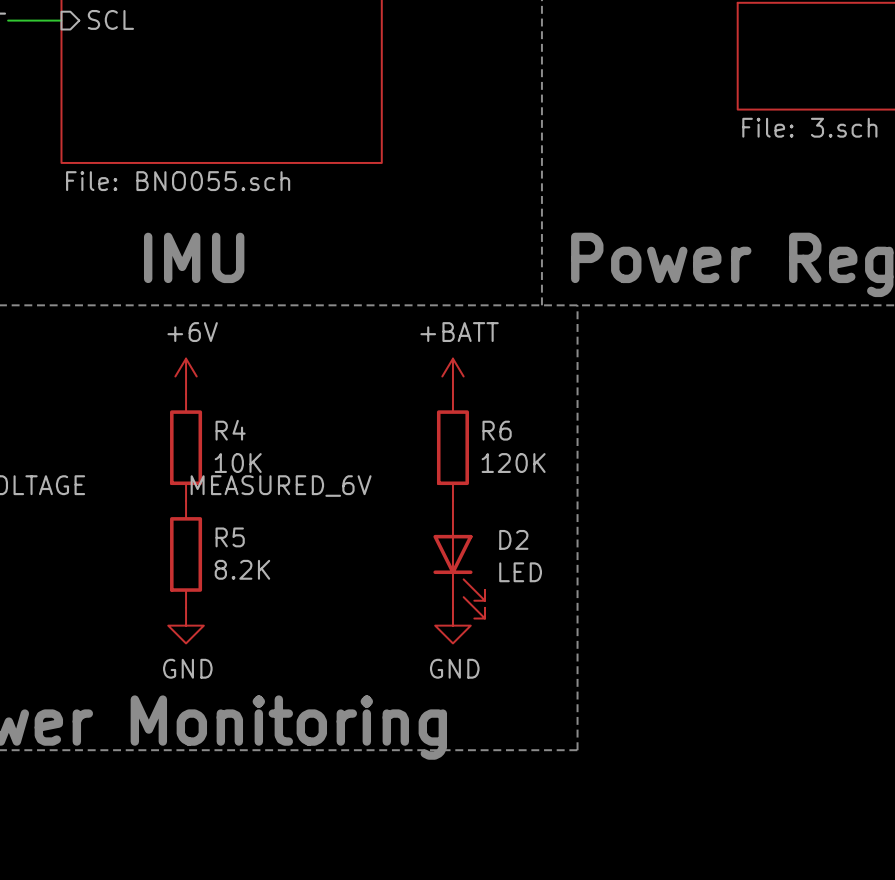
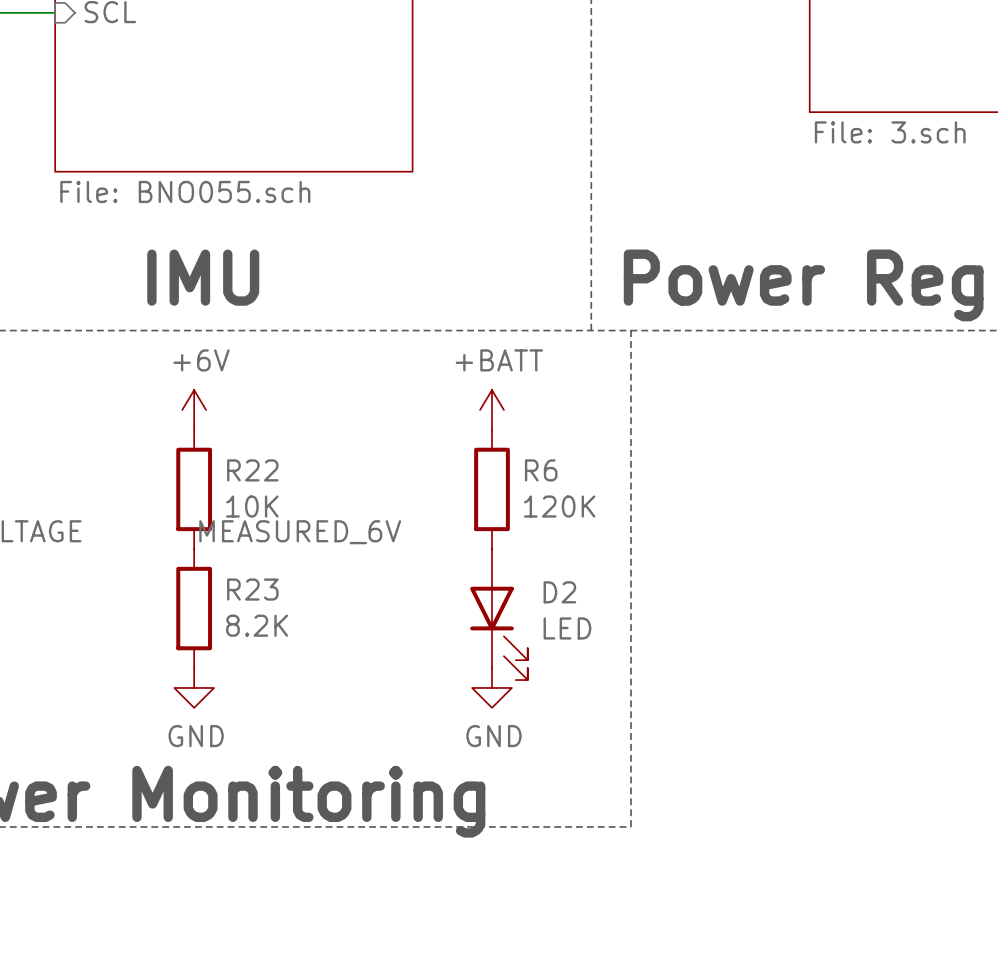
R4 name: R4 (230, 430) -> R22 (252, 470)
R5 name: R5 (230, 537) -> R23 (252, 589)

